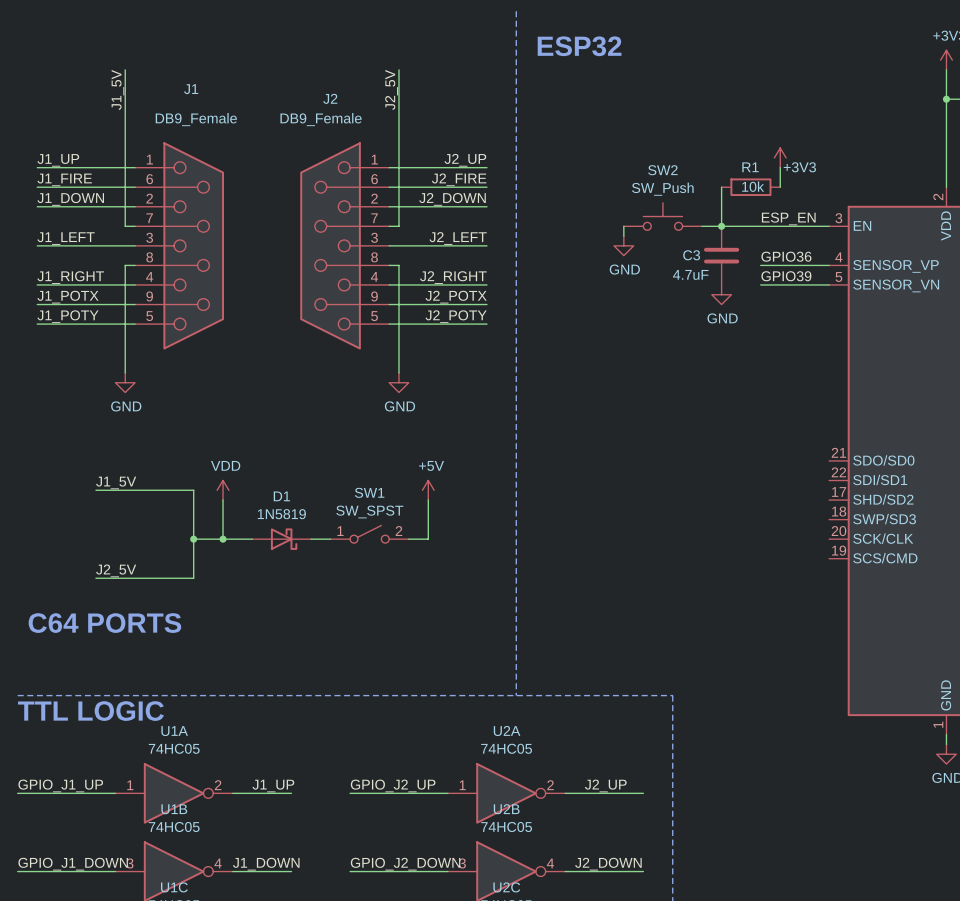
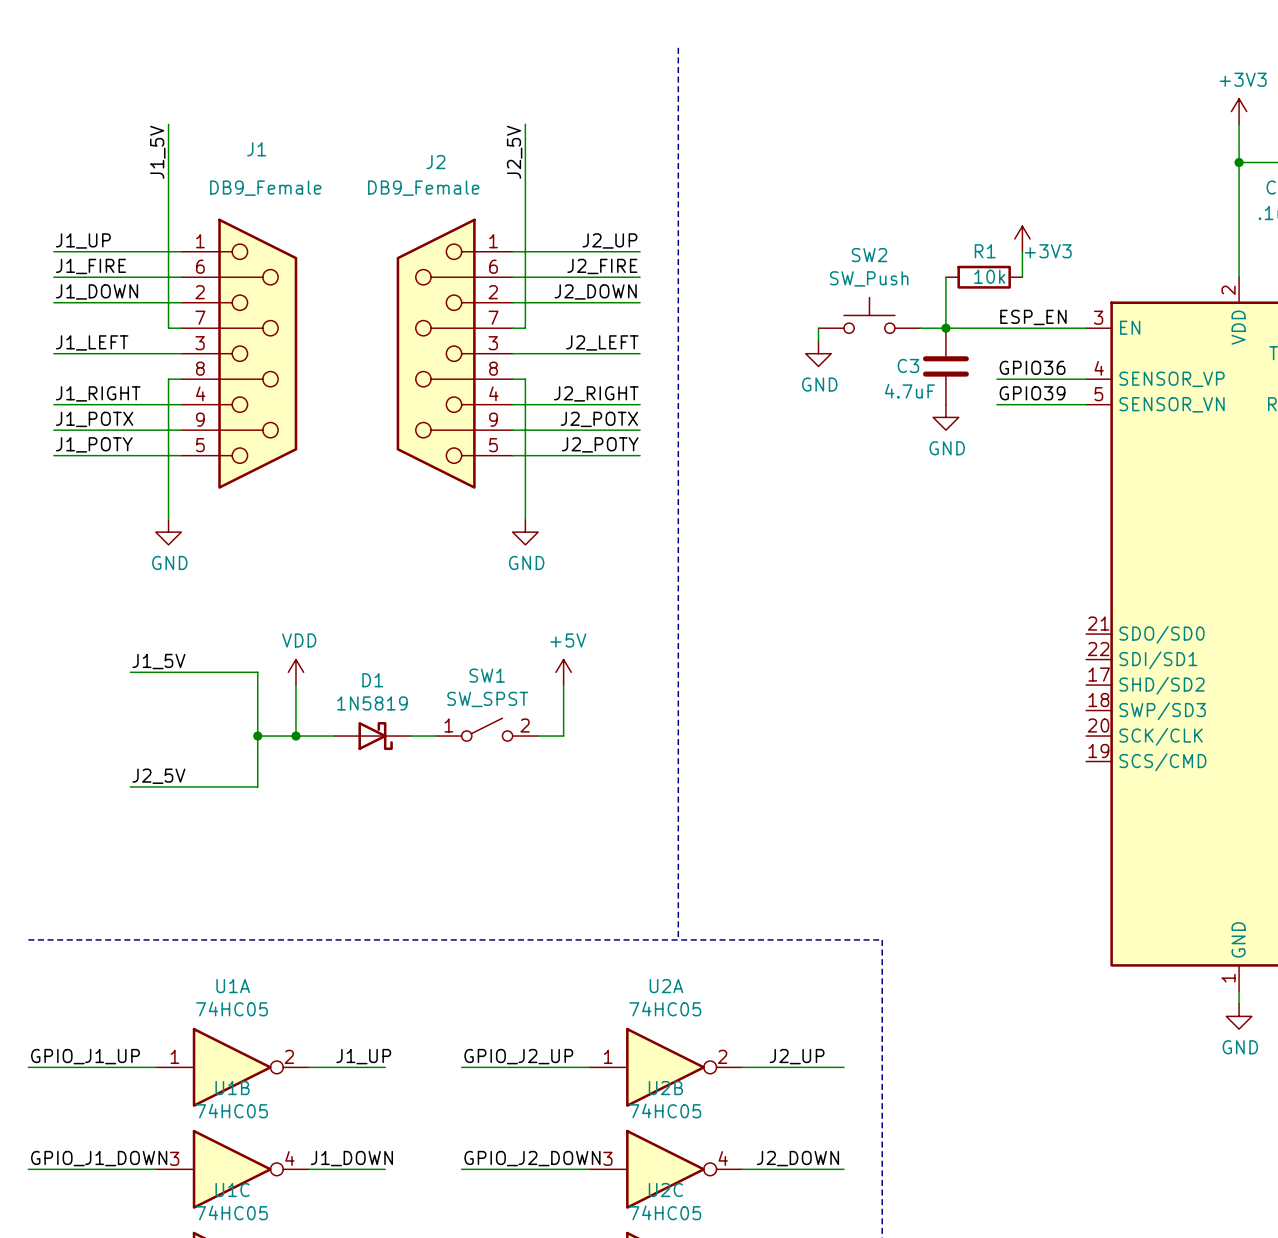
text: ESP32 (579, 46) -> none
text: C64 PORTS (104, 623) -> none
text: TTL LOGIC (90, 711) -> none

